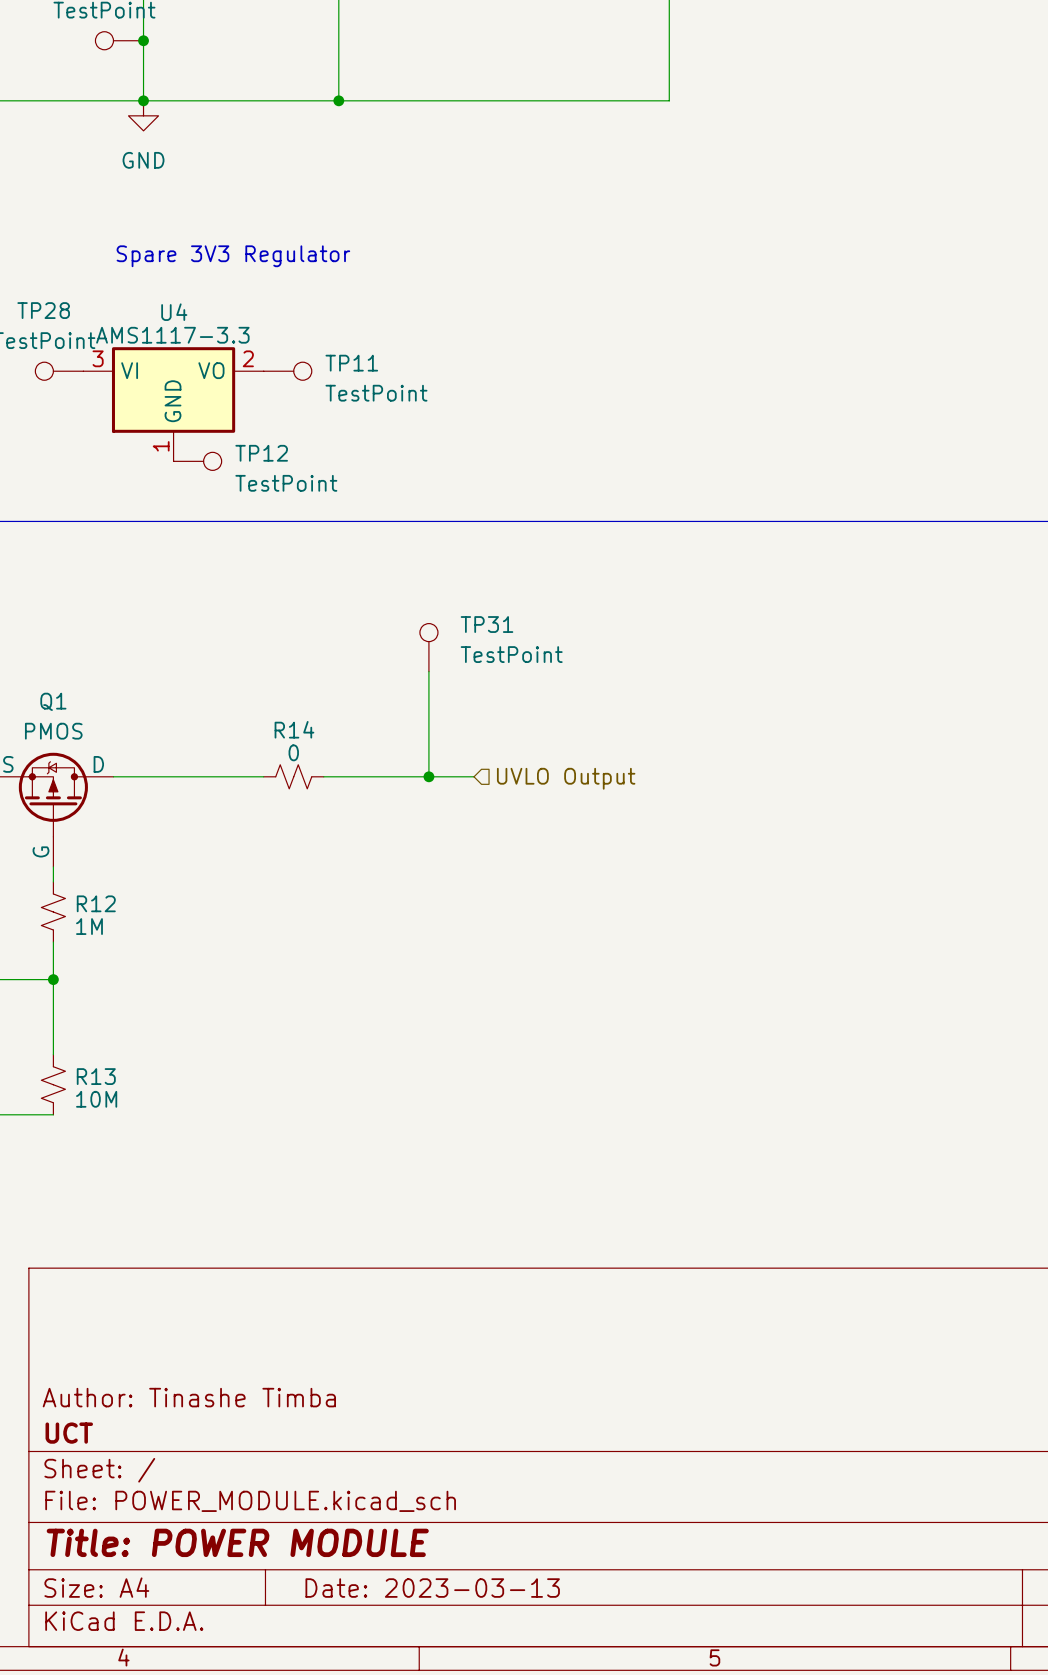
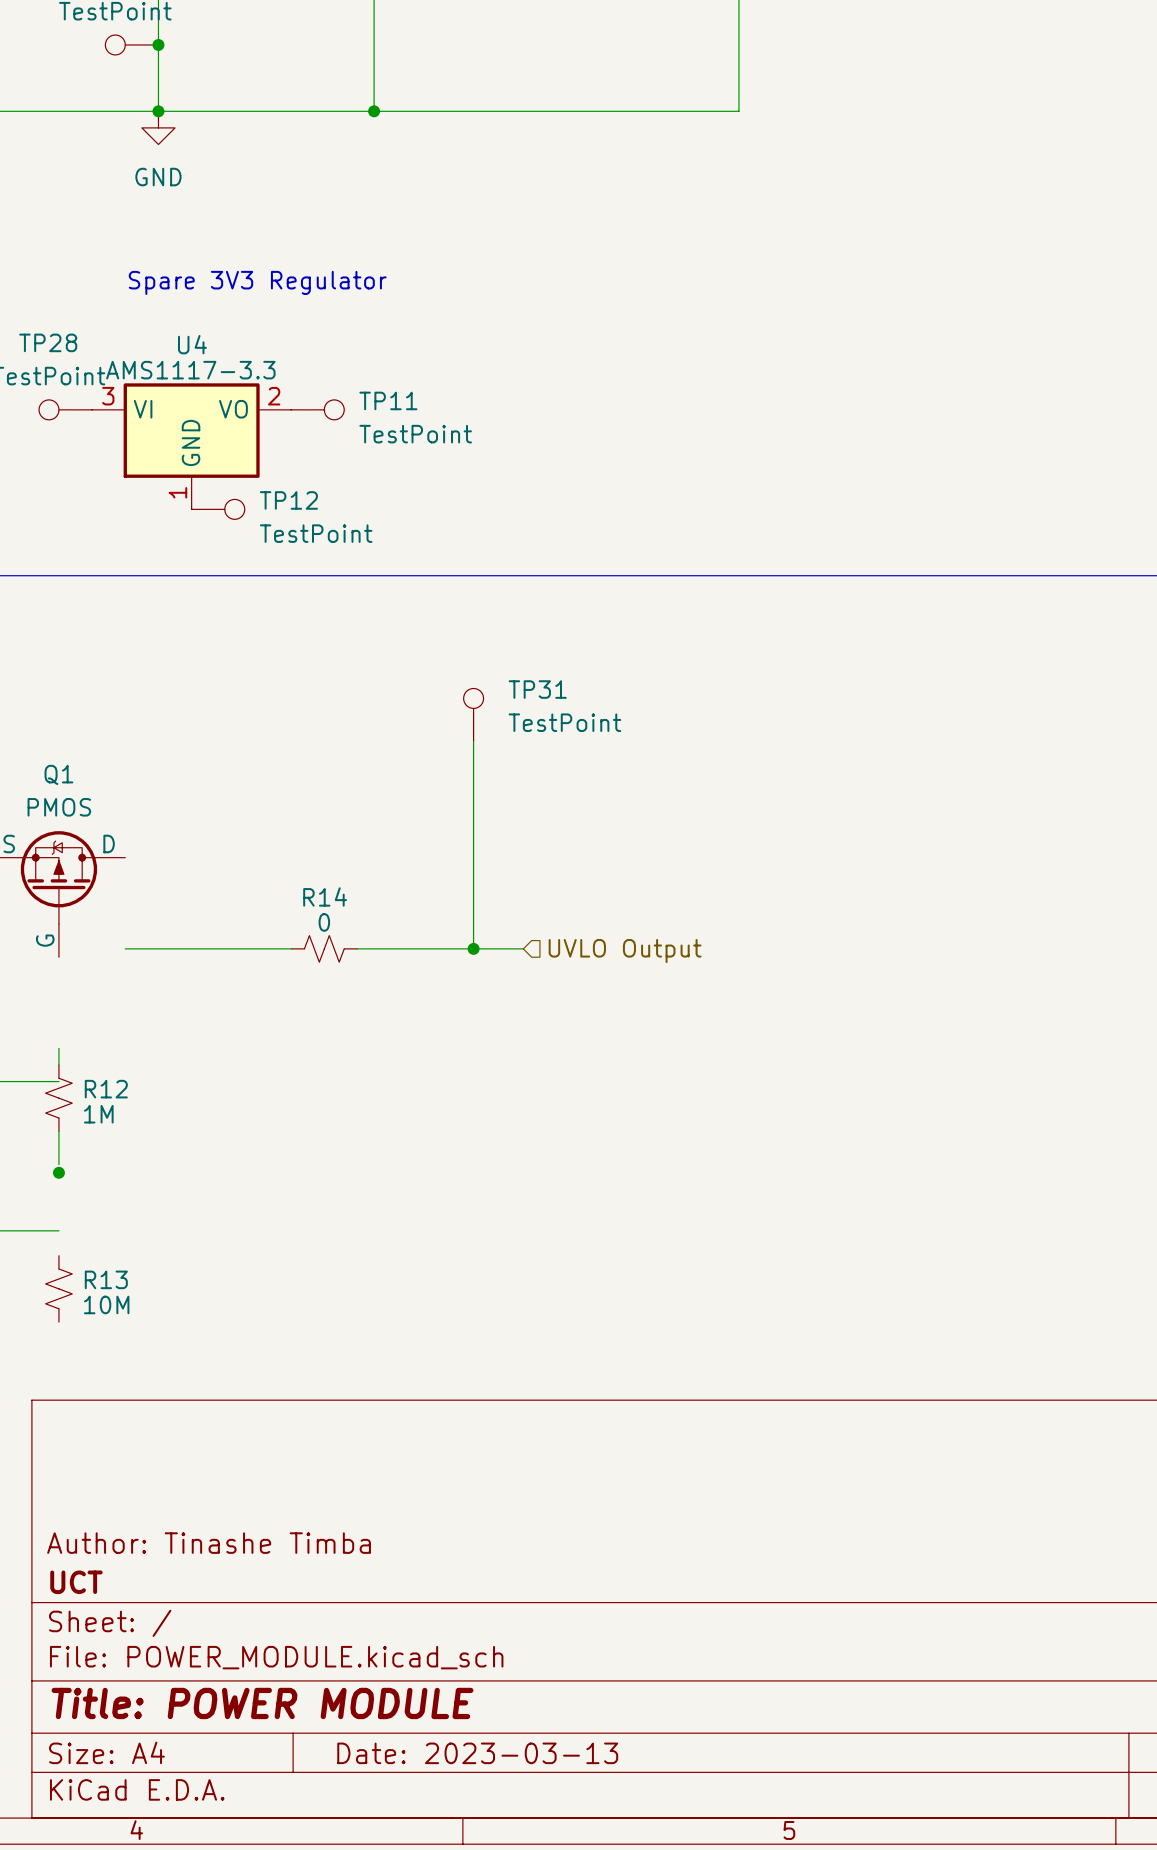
wire: (113, 776) (263, 776) -> (125, 948) (291, 948)
R14 position: (293, 776) -> (324, 948)
wire: (323, 776) (474, 776) -> (357, 948) (523, 948)
wire: none -> (473, 857) (473, 948)
junction: (428, 776) -> none
hierarchical label position: UVLO Output (566, 778) -> UVLO Output (625, 951)
junction: none -> (473, 948)
wire: (53, 866) (53, 881) -> none
R12 position: (53, 912) -> (58, 1098)
wire: (53, 942) (53, 949) -> none
junction: (53, 979) -> none
junction: none -> (58, 1172)
R13 position: (53, 1084) -> (58, 1288)

